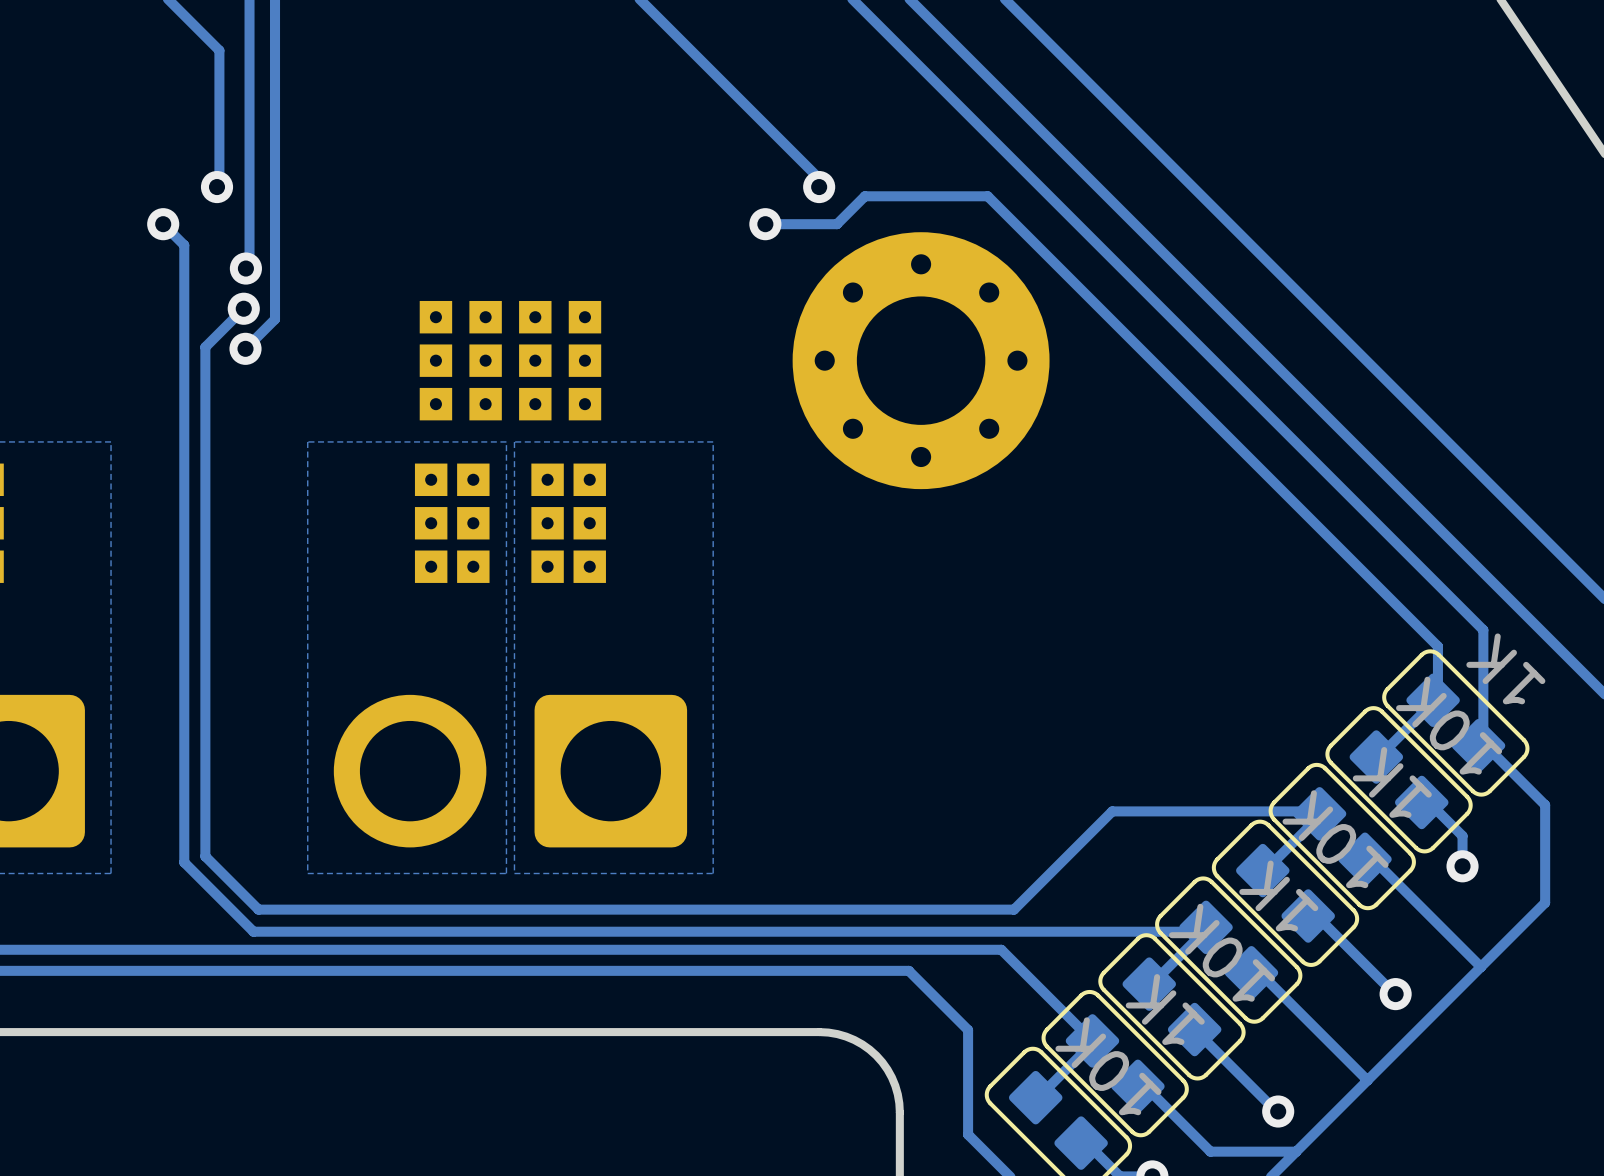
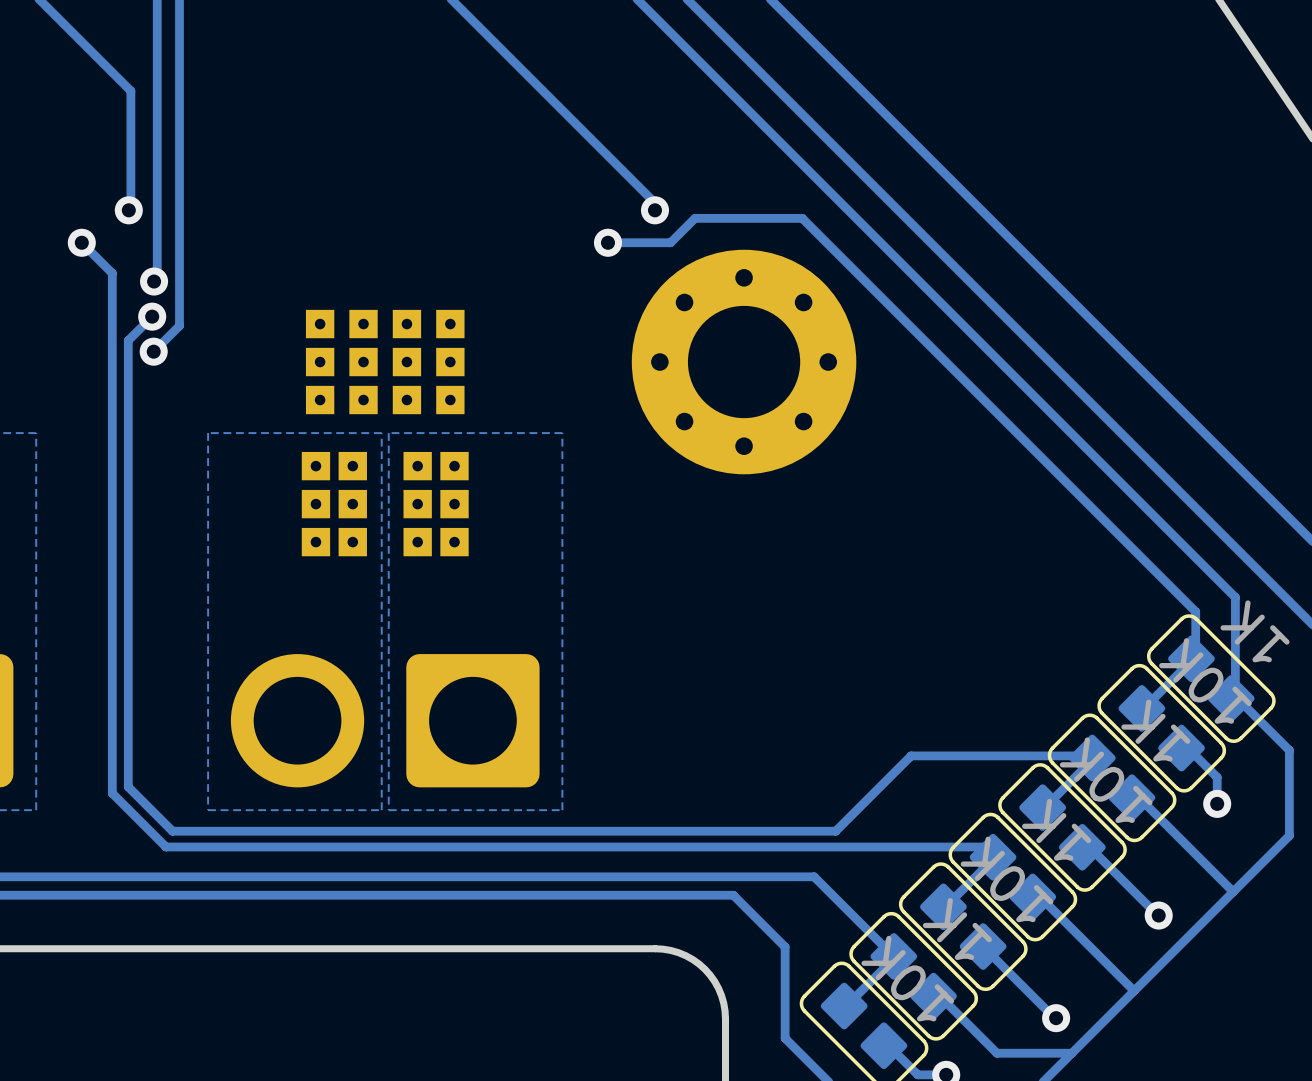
track: (184, 245) (184, 862) (253, 931) (1195, 931) (1206, 920) -> (100, 261) (112, 273) (112, 793) (165, 847) (989, 847) (993, 851)
track: (216, 336) (205, 347) (205, 856) (258, 909) (1014, 909) (1026, 897) -> (128, 340) (128, 786) (172, 831) (835, 831)

